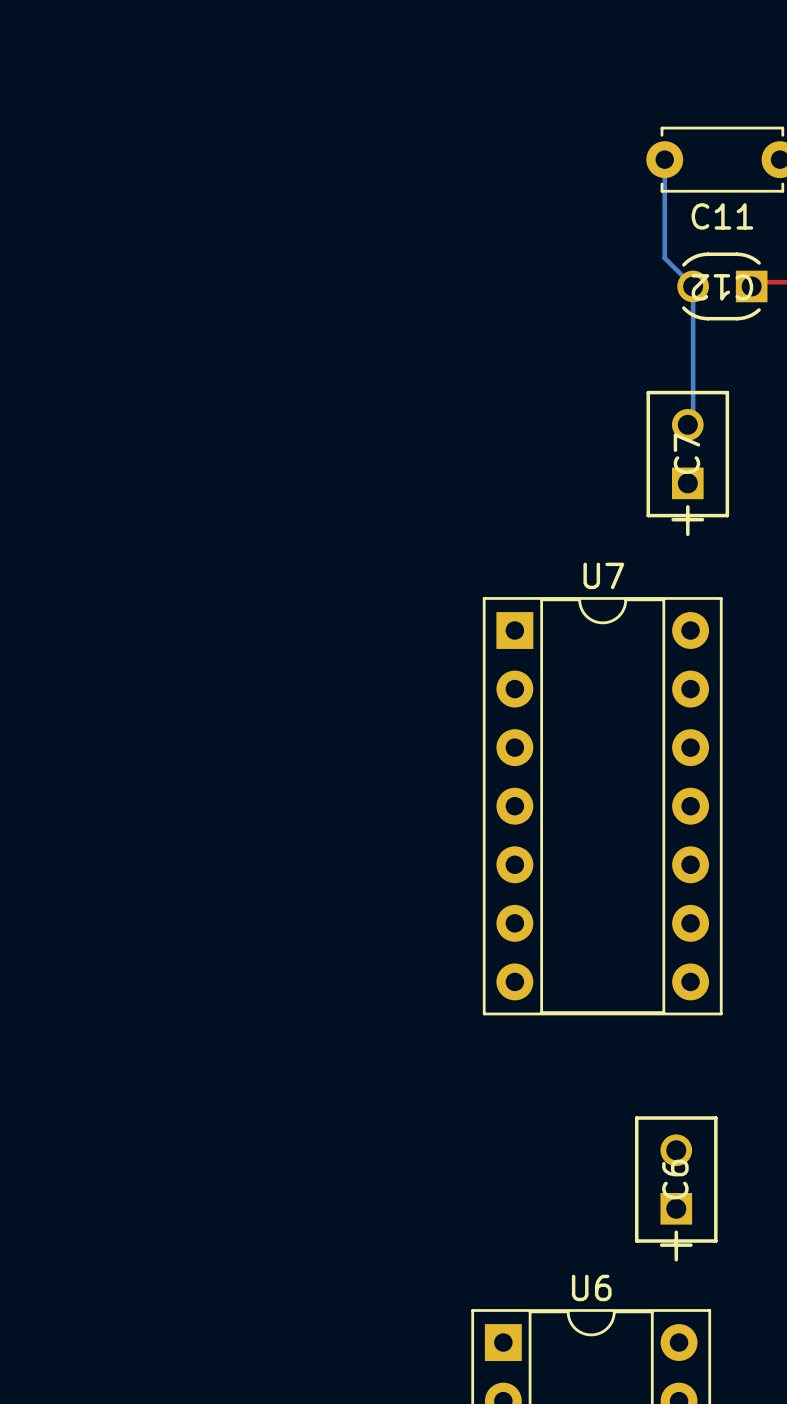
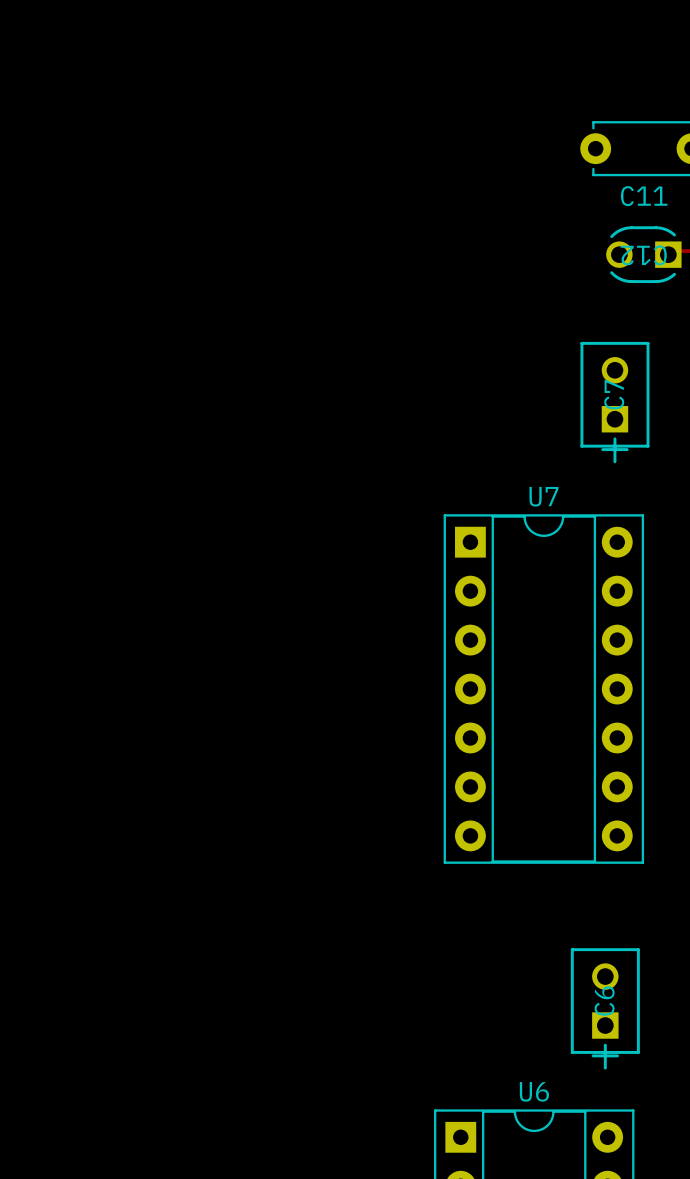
bottom track: (664, 159) (664, 258) (693, 286) (693, 419) (687, 424) -> none

